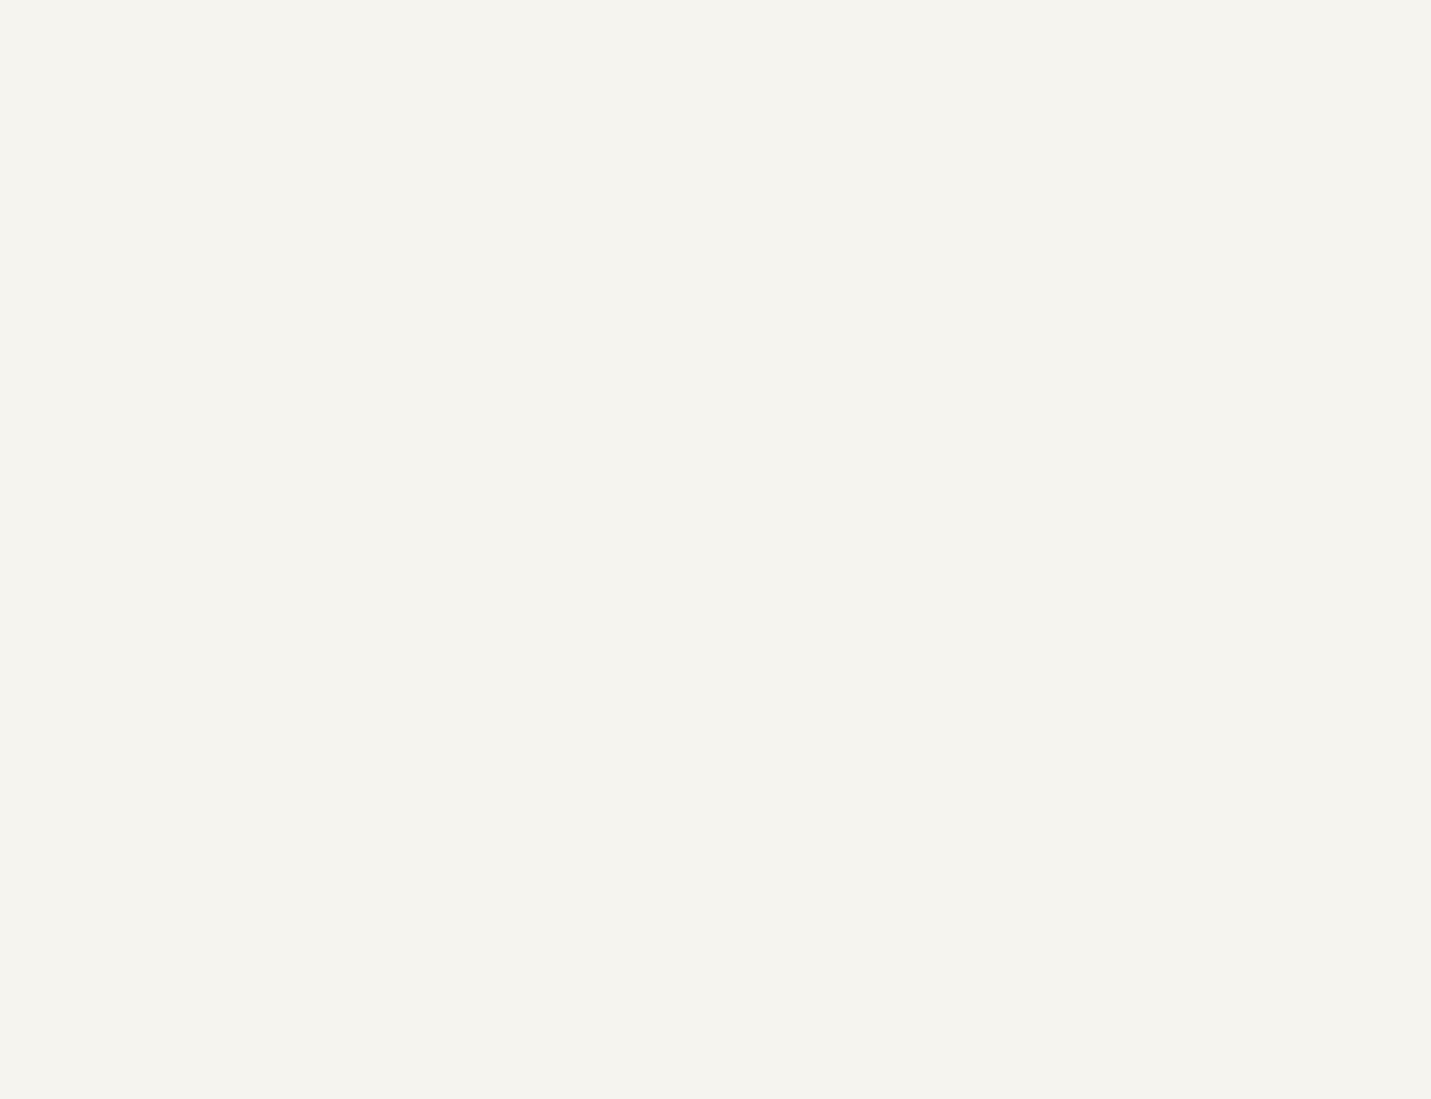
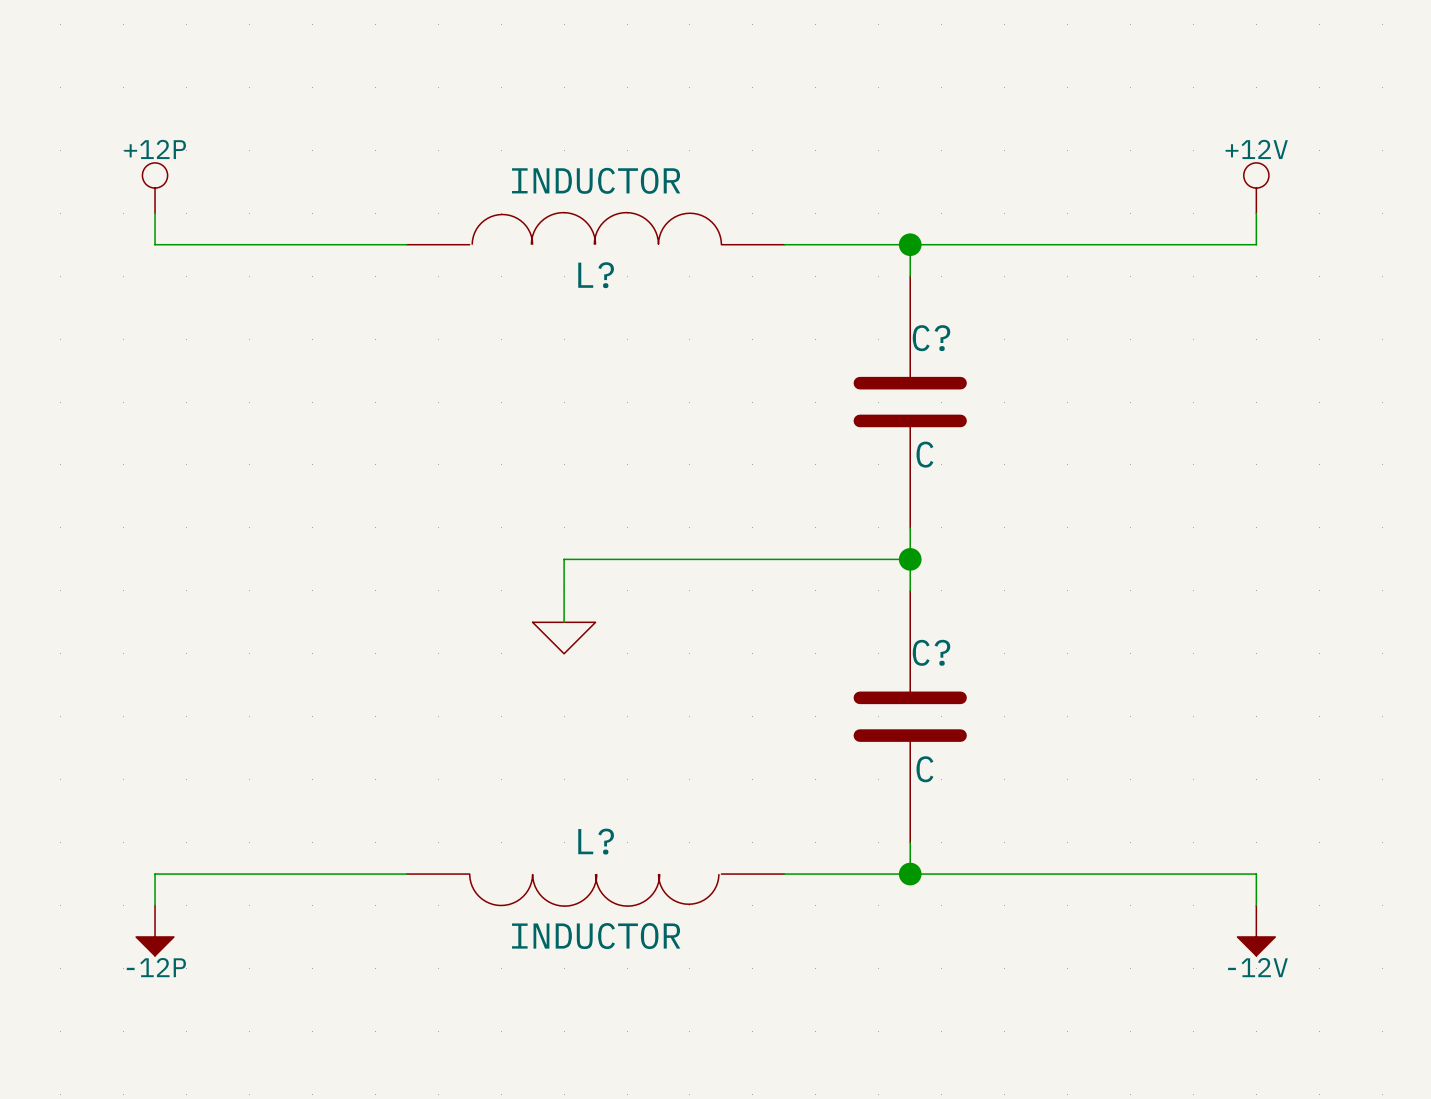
power symbol: none -> +12P (155, 188)
power symbol: none -> +12V (1256, 188)
wire: none -> (155, 213) (155, 244) (406, 244)
wire: none -> (1256, 213) (1256, 244) (784, 244)
L?: none -> INDUCTOR (595, 228)
wire: none -> (910, 244) (910, 276)
junction: none -> (910, 244)
C?: none -> C (910, 402)
wire: none -> (910, 527) (910, 590)
wire: none -> (910, 559) (564, 559) (564, 622)
junction: none -> (910, 559)
power symbol: none -> (564, 638)
C?: none -> C (910, 716)
wire: none -> (910, 842) (910, 874)
wire: none -> (406, 874) (155, 874) (155, 905)
wire: none -> (784, 874) (1256, 874) (1256, 905)
junction: none -> (910, 874)
L?: none -> INDUCTOR (595, 890)
power symbol: none -> -12P (155, 930)
power symbol: none -> -12V (1256, 930)

